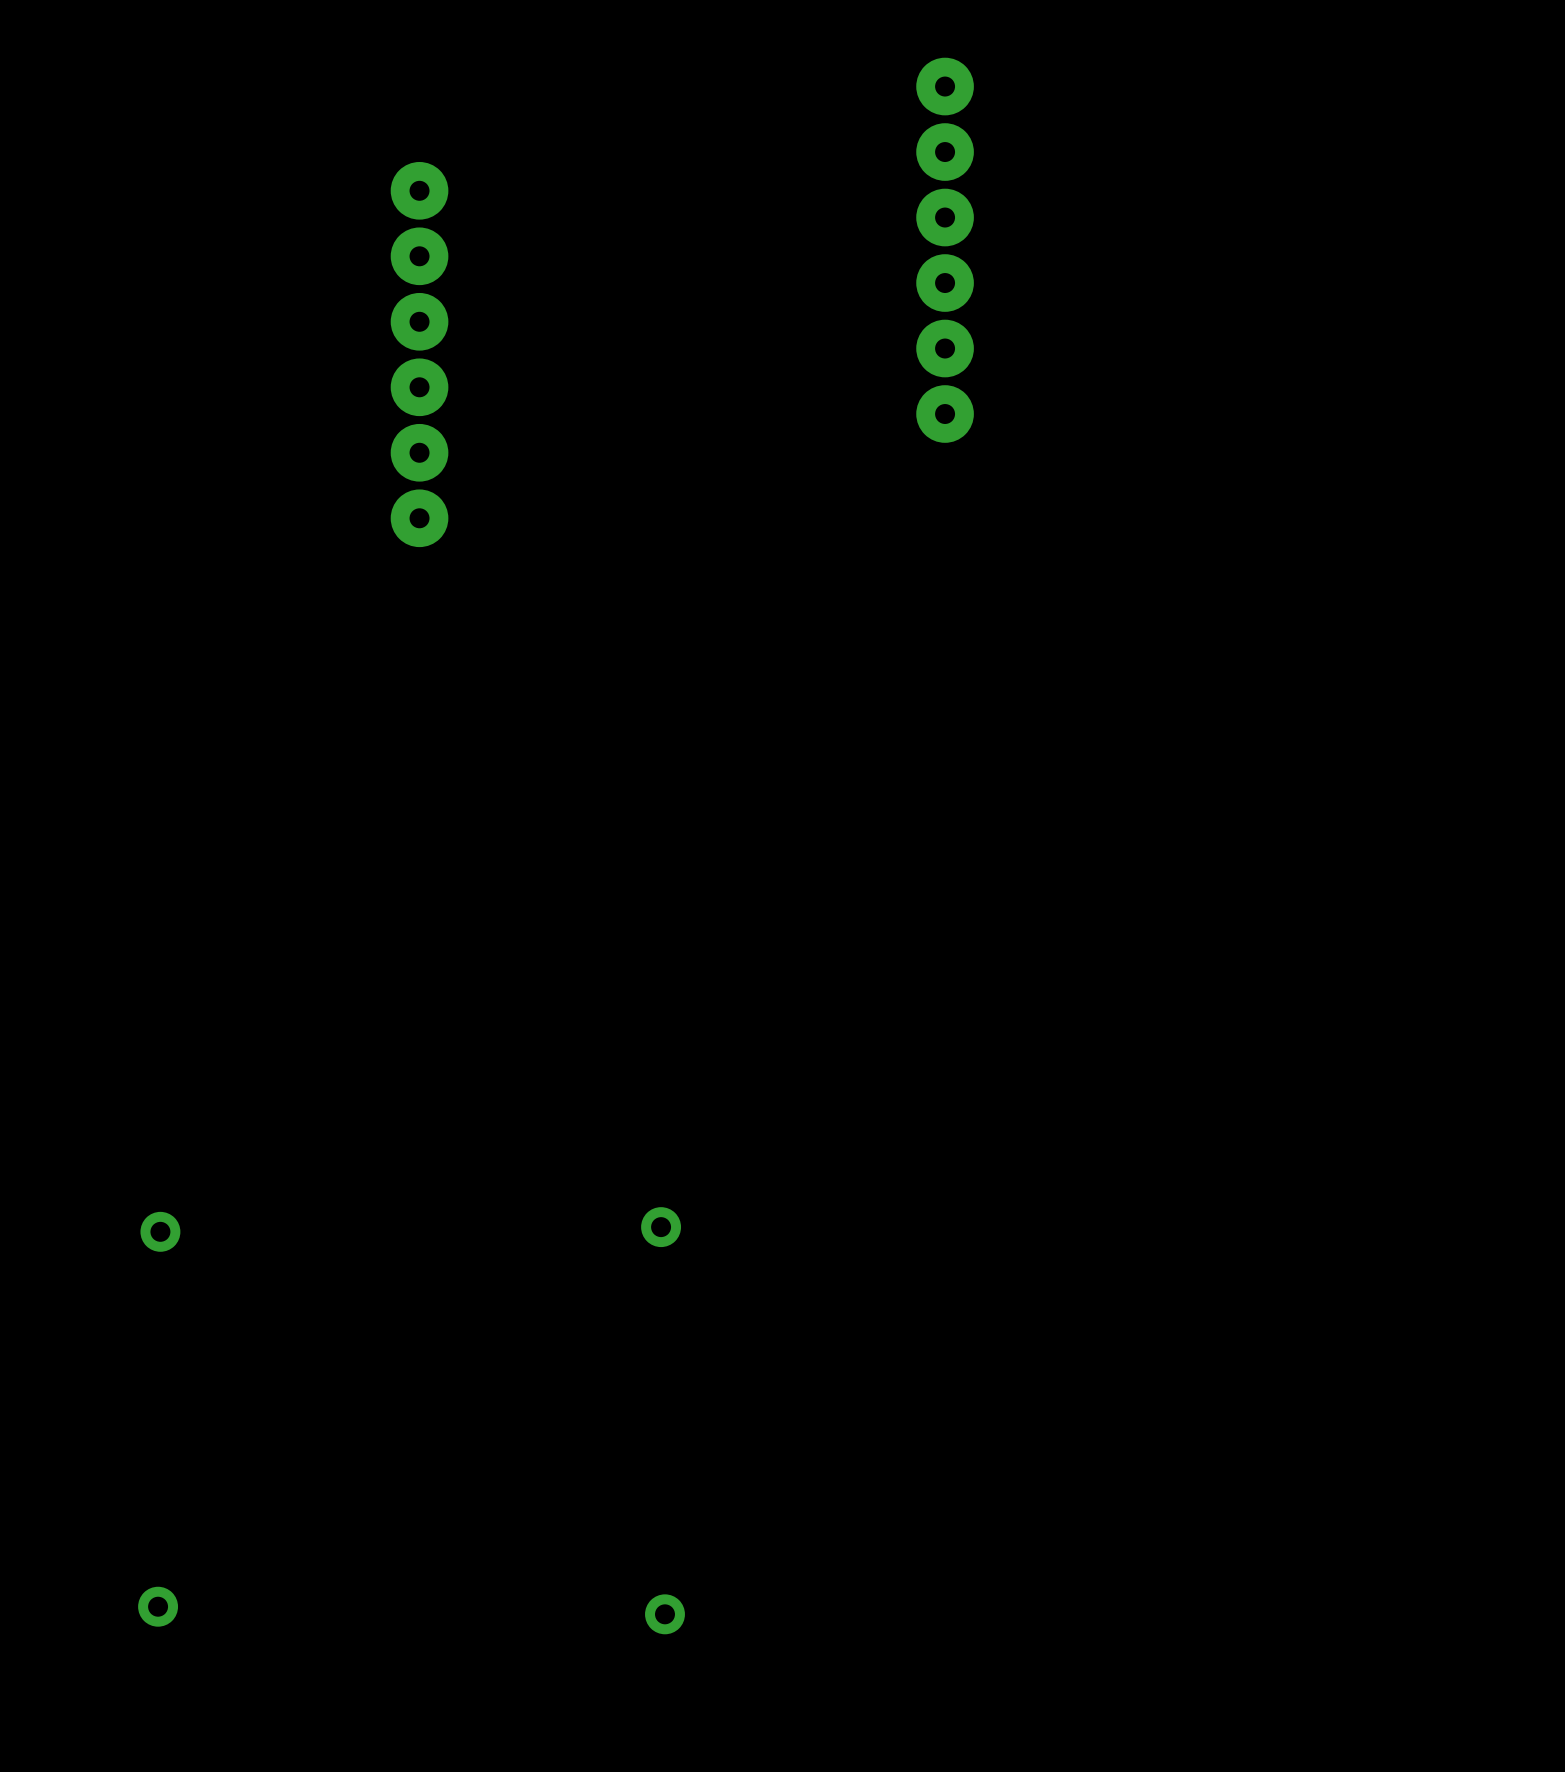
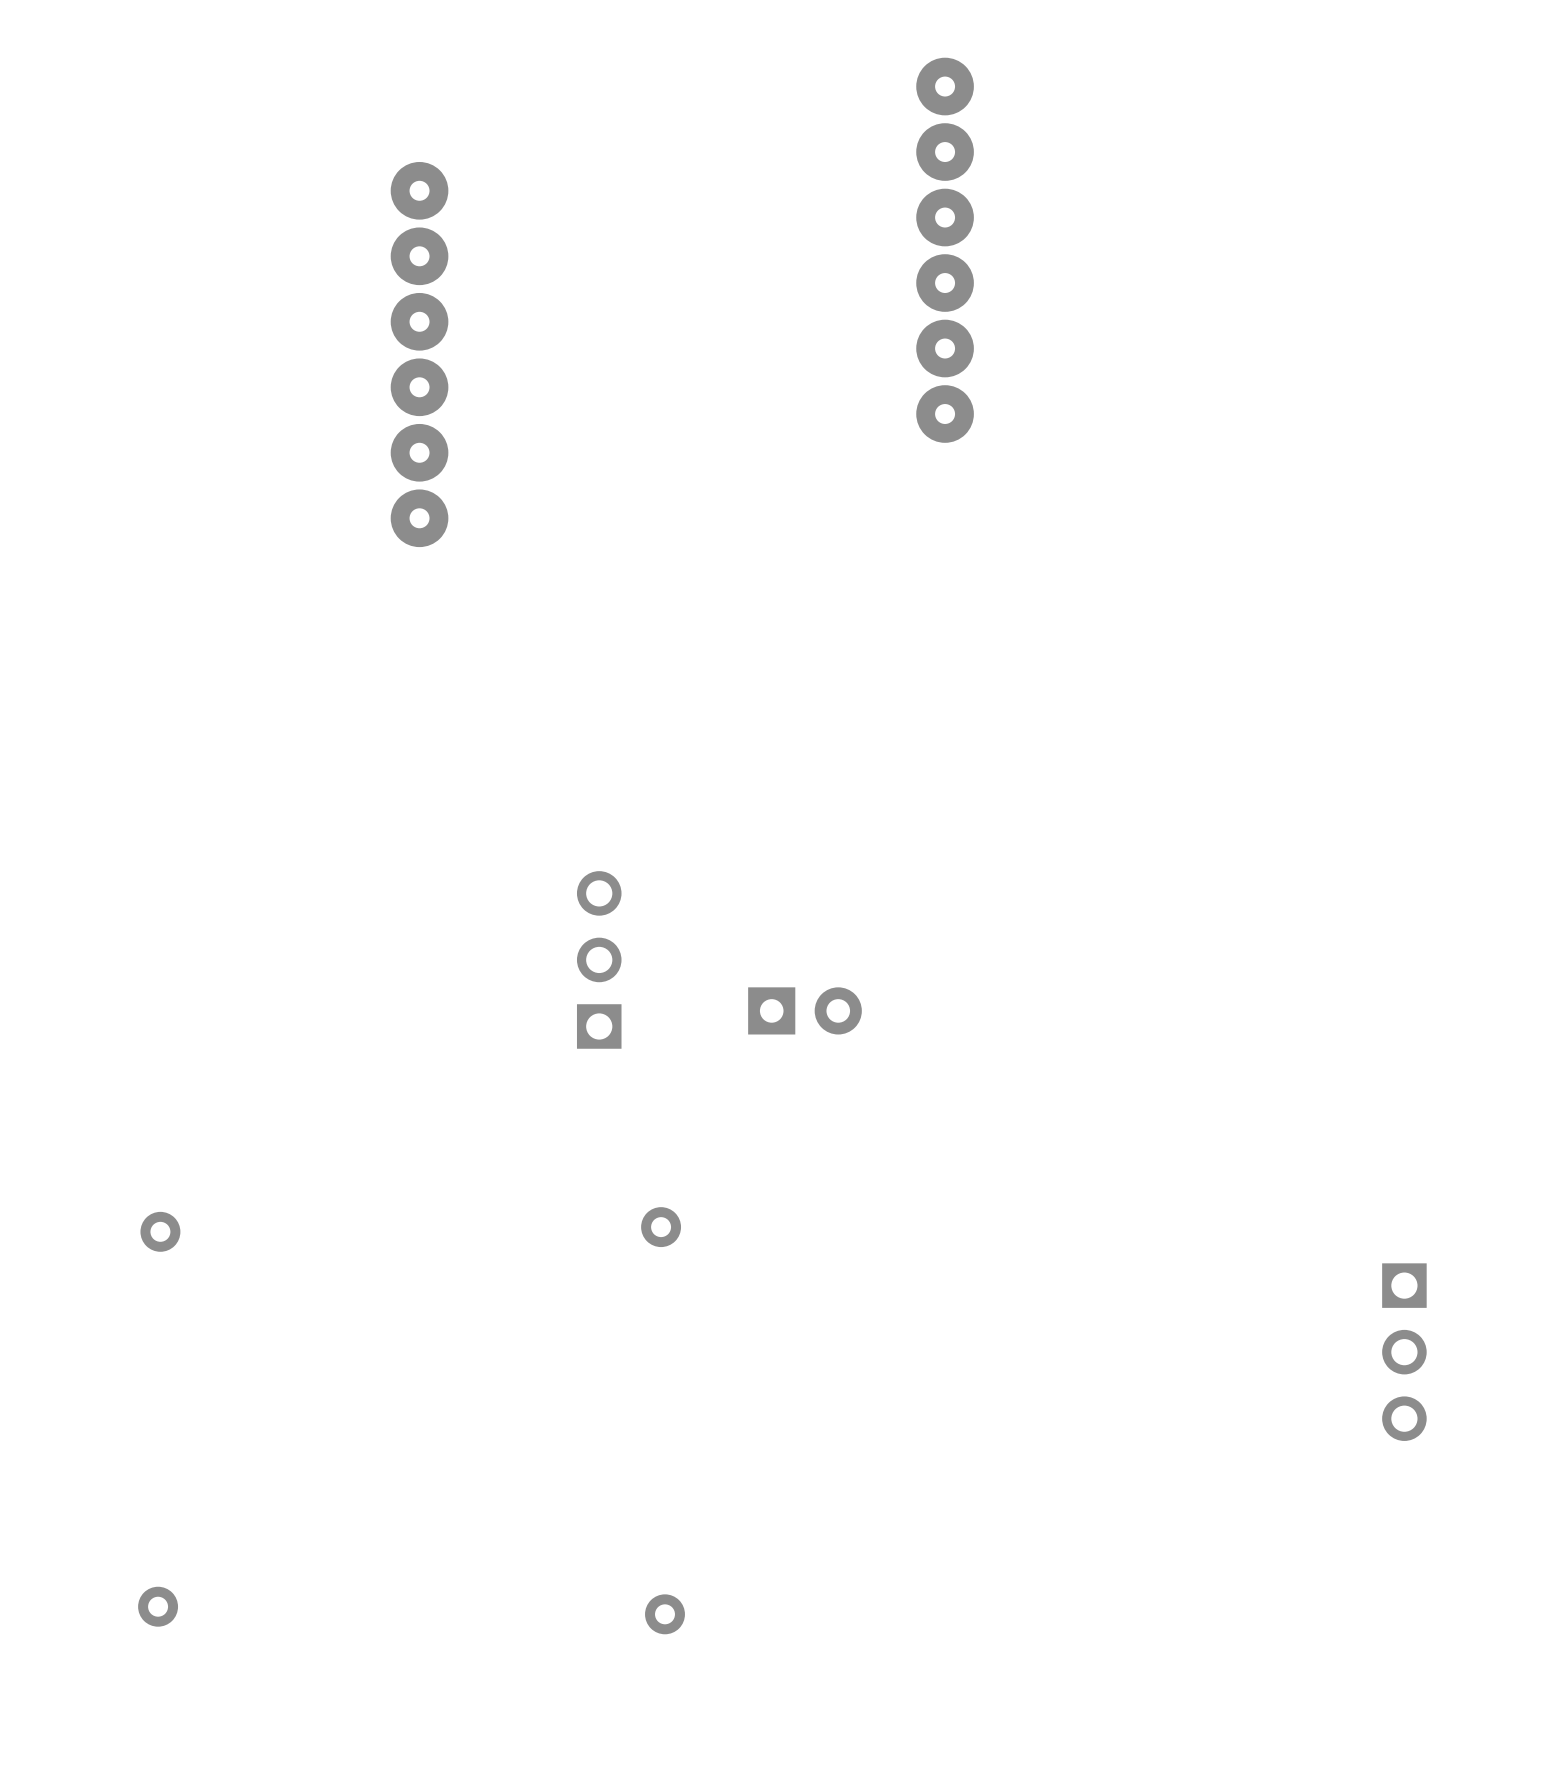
part: none -> (599, 959)
part: none -> (804, 1010)
part: none -> (1404, 1352)

